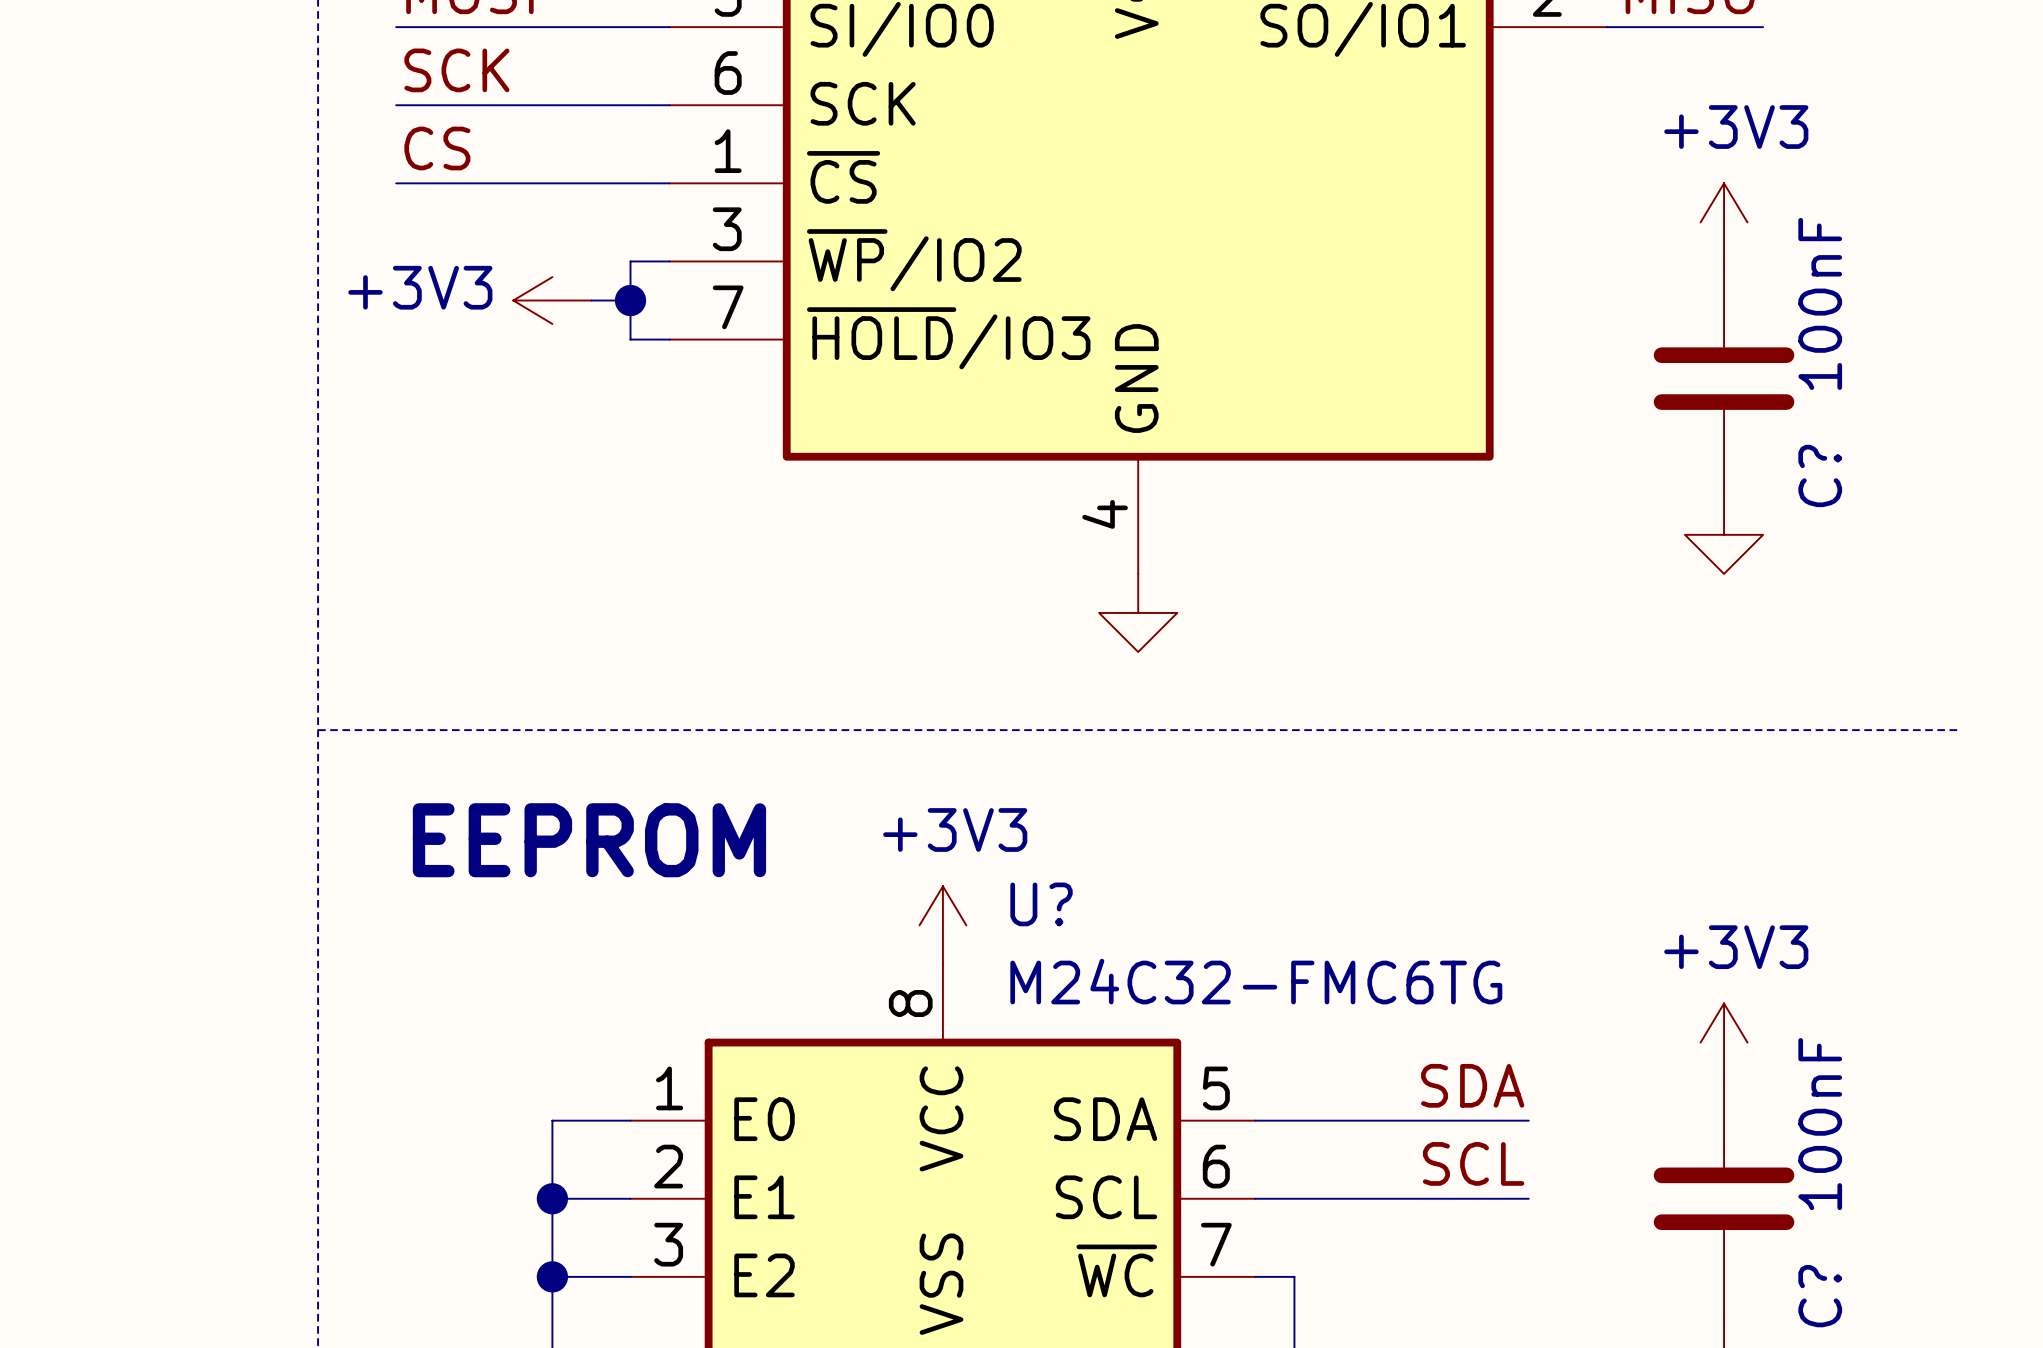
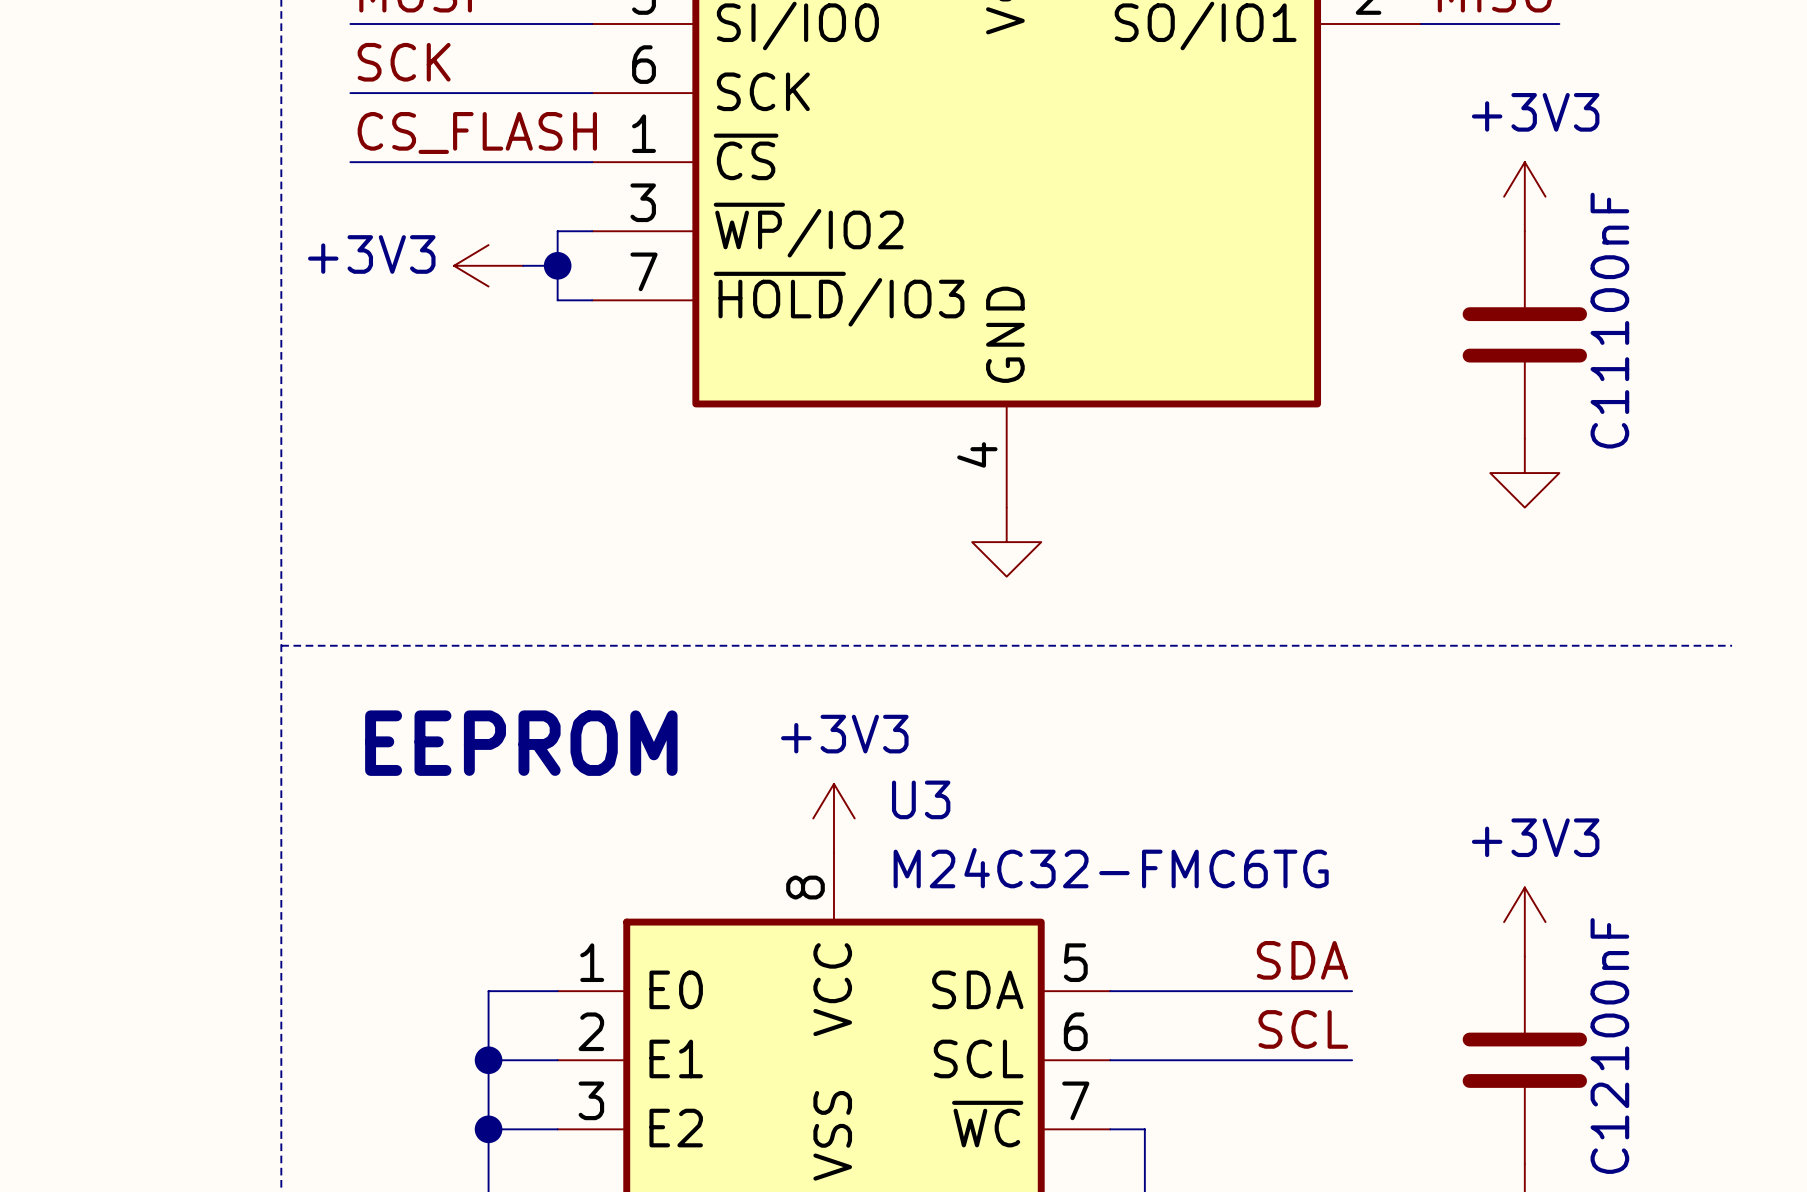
label: CS (437, 148) -> CS_FLASH (477, 132)
C? name: C? (1820, 475) -> C11 (1609, 402)
U? name: U? (1041, 904) -> U3 (921, 799)
C? name: C? (1820, 1296) -> C12 (1609, 1128)

